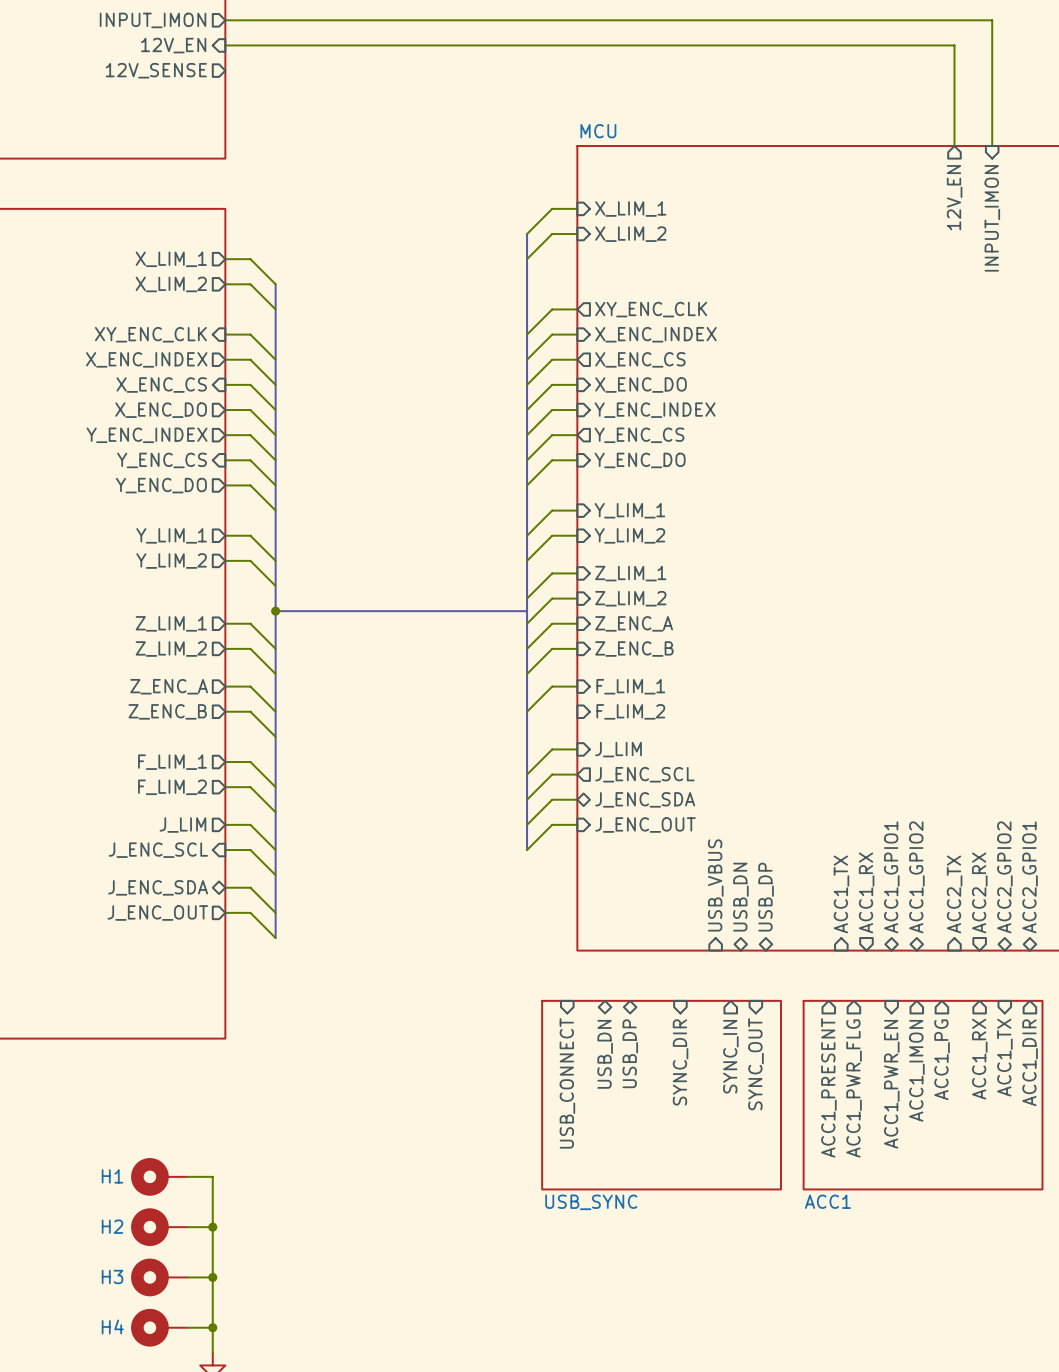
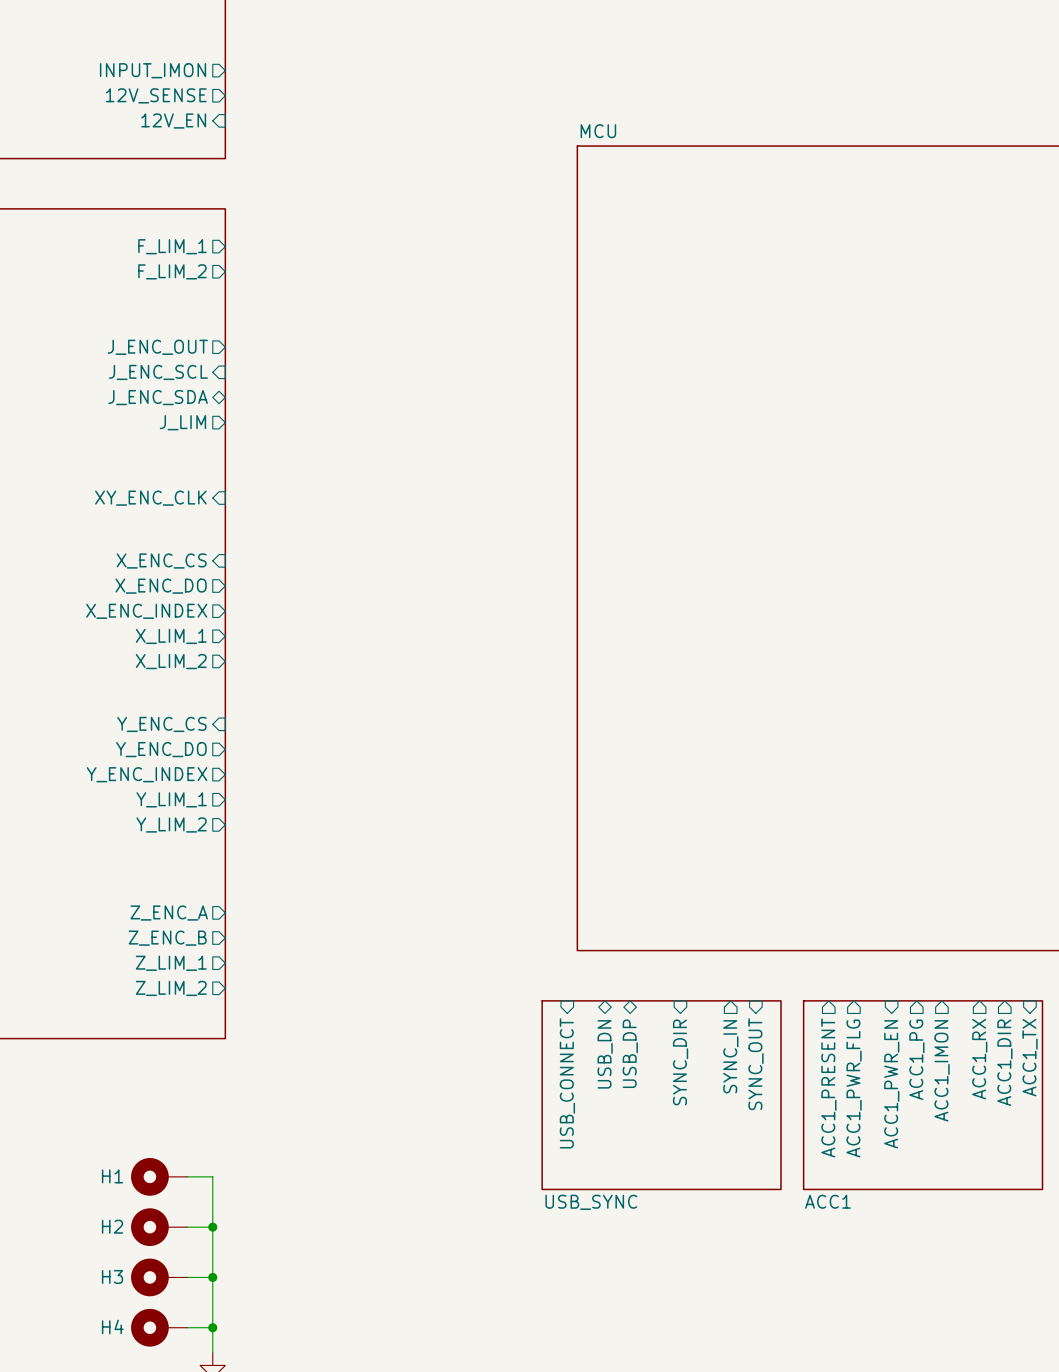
sheet pin: INPUT_IMON (153, 20) -> none
wire: (225, 20) (992, 20) (992, 146) -> none
sheet pin position: 12V_EN (173, 45) -> 12V_EN (173, 121)
wire: (225, 45) (954, 45) (954, 146) -> none
sheet pin: 12V_SENSE (156, 70) -> INPUT_IMON (153, 70)
sheet pin: none -> 12V_SENSE (156, 95)
sheet pin: 12V_EN (954, 197) -> none
wire: (577, 208) (552, 208) (527, 234) -> none
sheet pin: X_LIM_1 (630, 209) -> none
sheet pin: INPUT_IMON (992, 218) -> none
bus: (527, 234) (527, 850) -> none
wire: (577, 234) (552, 234) (527, 259) -> none
sheet pin: X_LIM_2 (630, 234) -> none
sheet pin: none -> F_LIM_1 (172, 246)
sheet pin: X_LIM_1 (171, 259) -> none
wire: (225, 259) (250, 259) (275, 284) -> none
sheet pin: none -> F_LIM_2 (172, 271)
sheet pin: X_LIM_2 (171, 284) -> none
wire: (225, 284) (250, 284) (275, 309) -> none
bus: (275, 284) (275, 938) -> none
wire: (577, 309) (552, 309) (527, 334) -> none
sheet pin: XY_ENC_CLK (651, 309) -> none
sheet pin position: XY_ENC_CLK (150, 334) -> XY_ENC_CLK (150, 498)
wire: (225, 334) (250, 334) (275, 359) -> none
wire: (577, 334) (552, 334) (527, 359) -> none
sheet pin: X_ENC_INDEX (655, 334) -> none
sheet pin: none -> J_ENC_OUT (157, 347)
sheet pin: X_ENC_INDEX (146, 359) -> none
wire: (225, 359) (250, 359) (275, 384) -> none
wire: (577, 359) (552, 359) (527, 384) -> none
sheet pin: X_ENC_CS (640, 359) -> none
sheet pin: none -> J_ENC_SCL (158, 372)
wire: (225, 384) (250, 384) (275, 410) -> none
wire: (577, 384) (552, 384) (527, 410) -> none
sheet pin: X_ENC_CS (161, 385) -> none
sheet pin: X_ENC_DO (640, 385) -> none
sheet pin: none -> J_ENC_SDA (158, 397)
sheet pin position: X_ENC_DO (161, 410) -> X_ENC_DO (161, 586)
wire: (225, 410) (250, 410) (275, 435) -> none
wire: (577, 410) (552, 410) (527, 435) -> none
sheet pin: Y_ENC_INDEX (655, 410) -> none
sheet pin: none -> J_LIM (182, 422)
sheet pin: Y_ENC_INDEX (147, 435) -> none
wire: (225, 435) (250, 435) (275, 460) -> none
wire: (577, 435) (552, 435) (527, 460) -> none
sheet pin: Y_ENC_CS (639, 435) -> none
sheet pin: Y_ENC_CS (161, 460) -> none
wire: (225, 460) (250, 460) (275, 485) -> none
wire: (577, 460) (552, 460) (527, 485) -> none
sheet pin: Y_ENC_DO (640, 460) -> none
sheet pin: Y_ENC_DO (161, 485) -> none
wire: (225, 485) (250, 485) (275, 510) -> none
wire: (577, 510) (552, 510) (527, 535) -> none
sheet pin: Y_LIM_1 (629, 510) -> none
sheet pin: Y_LIM_1 (171, 535) -> none
wire: (225, 535) (250, 535) (275, 560) -> none
wire: (577, 535) (552, 535) (527, 560) -> none
sheet pin: Y_LIM_2 (629, 535) -> none
wire: (225, 560) (250, 560) (275, 586) -> none
sheet pin shape: output (171, 561) -> input (161, 561)
sheet pin: Y_LIM_2 (171, 561) -> X_ENC_CS (161, 561)
wire: (577, 573) (552, 573) (527, 598) -> none
sheet pin: Z_LIM_1 (630, 573) -> none
wire: (577, 598) (552, 598) (527, 623) -> none
sheet pin: Z_LIM_2 (630, 598) -> none
sheet pin: none -> X_ENC_INDEX (146, 611)
bus: (275, 611) (527, 611) -> none
junction: (275, 611) -> none
sheet pin: Z_LIM_1 (171, 623) -> none
wire: (225, 623) (250, 623) (275, 648) -> none
wire: (577, 623) (552, 623) (527, 648) -> none
sheet pin: Z_ENC_A (634, 623) -> none
sheet pin: none -> X_LIM_1 (171, 636)
wire: (225, 648) (250, 648) (275, 674) -> none
wire: (577, 648) (552, 648) (527, 674) -> none
sheet pin: Z_LIM_2 (171, 649) -> none
sheet pin: Z_ENC_B (634, 649) -> none
sheet pin: none -> X_LIM_2 (171, 661)
sheet pin: Z_ENC_A (169, 686) -> none
wire: (225, 686) (250, 686) (275, 711) -> none
wire: (577, 686) (552, 686) (527, 711) -> none
sheet pin: F_LIM_1 (630, 686) -> none
sheet pin position: Z_ENC_B (167, 711) -> Z_ENC_B (167, 938)
wire: (225, 711) (250, 711) (275, 736) -> none
sheet pin: F_LIM_2 (630, 711) -> none
sheet pin: none -> Y_ENC_CS (161, 724)
sheet pin: none -> Y_ENC_DO (161, 749)
wire: (577, 749) (552, 749) (527, 774) -> none
sheet pin: J_LIM (618, 749) -> none
sheet pin: F_LIM_1 (172, 762) -> none
wire: (225, 762) (250, 762) (275, 787) -> none
sheet pin: none -> Y_ENC_INDEX (147, 774)
wire: (577, 774) (552, 774) (527, 799) -> none
sheet pin: J_ENC_SCL (644, 774) -> none
sheet pin: F_LIM_2 (172, 787) -> Y_LIM_1 (171, 799)
wire: (225, 787) (250, 787) (275, 812) -> none
wire: (577, 799) (552, 799) (527, 824) -> none
sheet pin: J_ENC_SDA (645, 799) -> none
wire: (225, 824) (250, 824) (275, 850) -> none
wire: (577, 824) (552, 824) (527, 850) -> none
sheet pin: J_LIM (182, 825) -> Y_LIM_2 (171, 825)
sheet pin: J_ENC_OUT (645, 825) -> none
sheet pin: J_ENC_SCL (158, 850) -> none
wire: (225, 850) (250, 850) (275, 875) -> none
sheet pin: ACC1_GPIO1 (891, 877) -> none
sheet pin: ACC1_GPIO2 (916, 877) -> none
sheet pin: ACC2_GPIO2 (1004, 877) -> none
sheet pin: ACC2_GPIO1 (1030, 877) -> none
sheet pin: USB_VBUS (715, 885) -> none
sheet pin: J_ENC_SDA (158, 887) -> none
wire: (225, 887) (250, 887) (275, 912) -> none
sheet pin: ACC1_RX (866, 892) -> none
sheet pin: ACC2_RX (979, 892) -> none
sheet pin: ACC1_TX (841, 894) -> none
sheet pin: ACC2_TX (954, 894) -> none
sheet pin: USB_DN (740, 897) -> none
sheet pin: USB_DP (766, 897) -> none
wire: (225, 912) (250, 912) (275, 938) -> none
sheet pin: J_ENC_OUT (157, 913) -> Z_ENC_A (169, 913)
sheet pin: none -> Z_LIM_1 (171, 963)
sheet pin: none -> Z_LIM_2 (171, 988)
sheet pin shape: input (1004, 1057) -> output (1004, 1062)
sheet pin: ACC1_TX (1004, 1057) -> ACC1_DIR (1004, 1062)
sheet pin: ACC1_PG (942, 1059) -> ACC1_IMON (942, 1070)
sheet pin shape: output (1030, 1062) -> input (1030, 1057)
sheet pin: ACC1_DIR (1030, 1062) -> ACC1_TX (1030, 1057)
sheet pin: ACC1_IMON (916, 1070) -> ACC1_PG (916, 1059)

